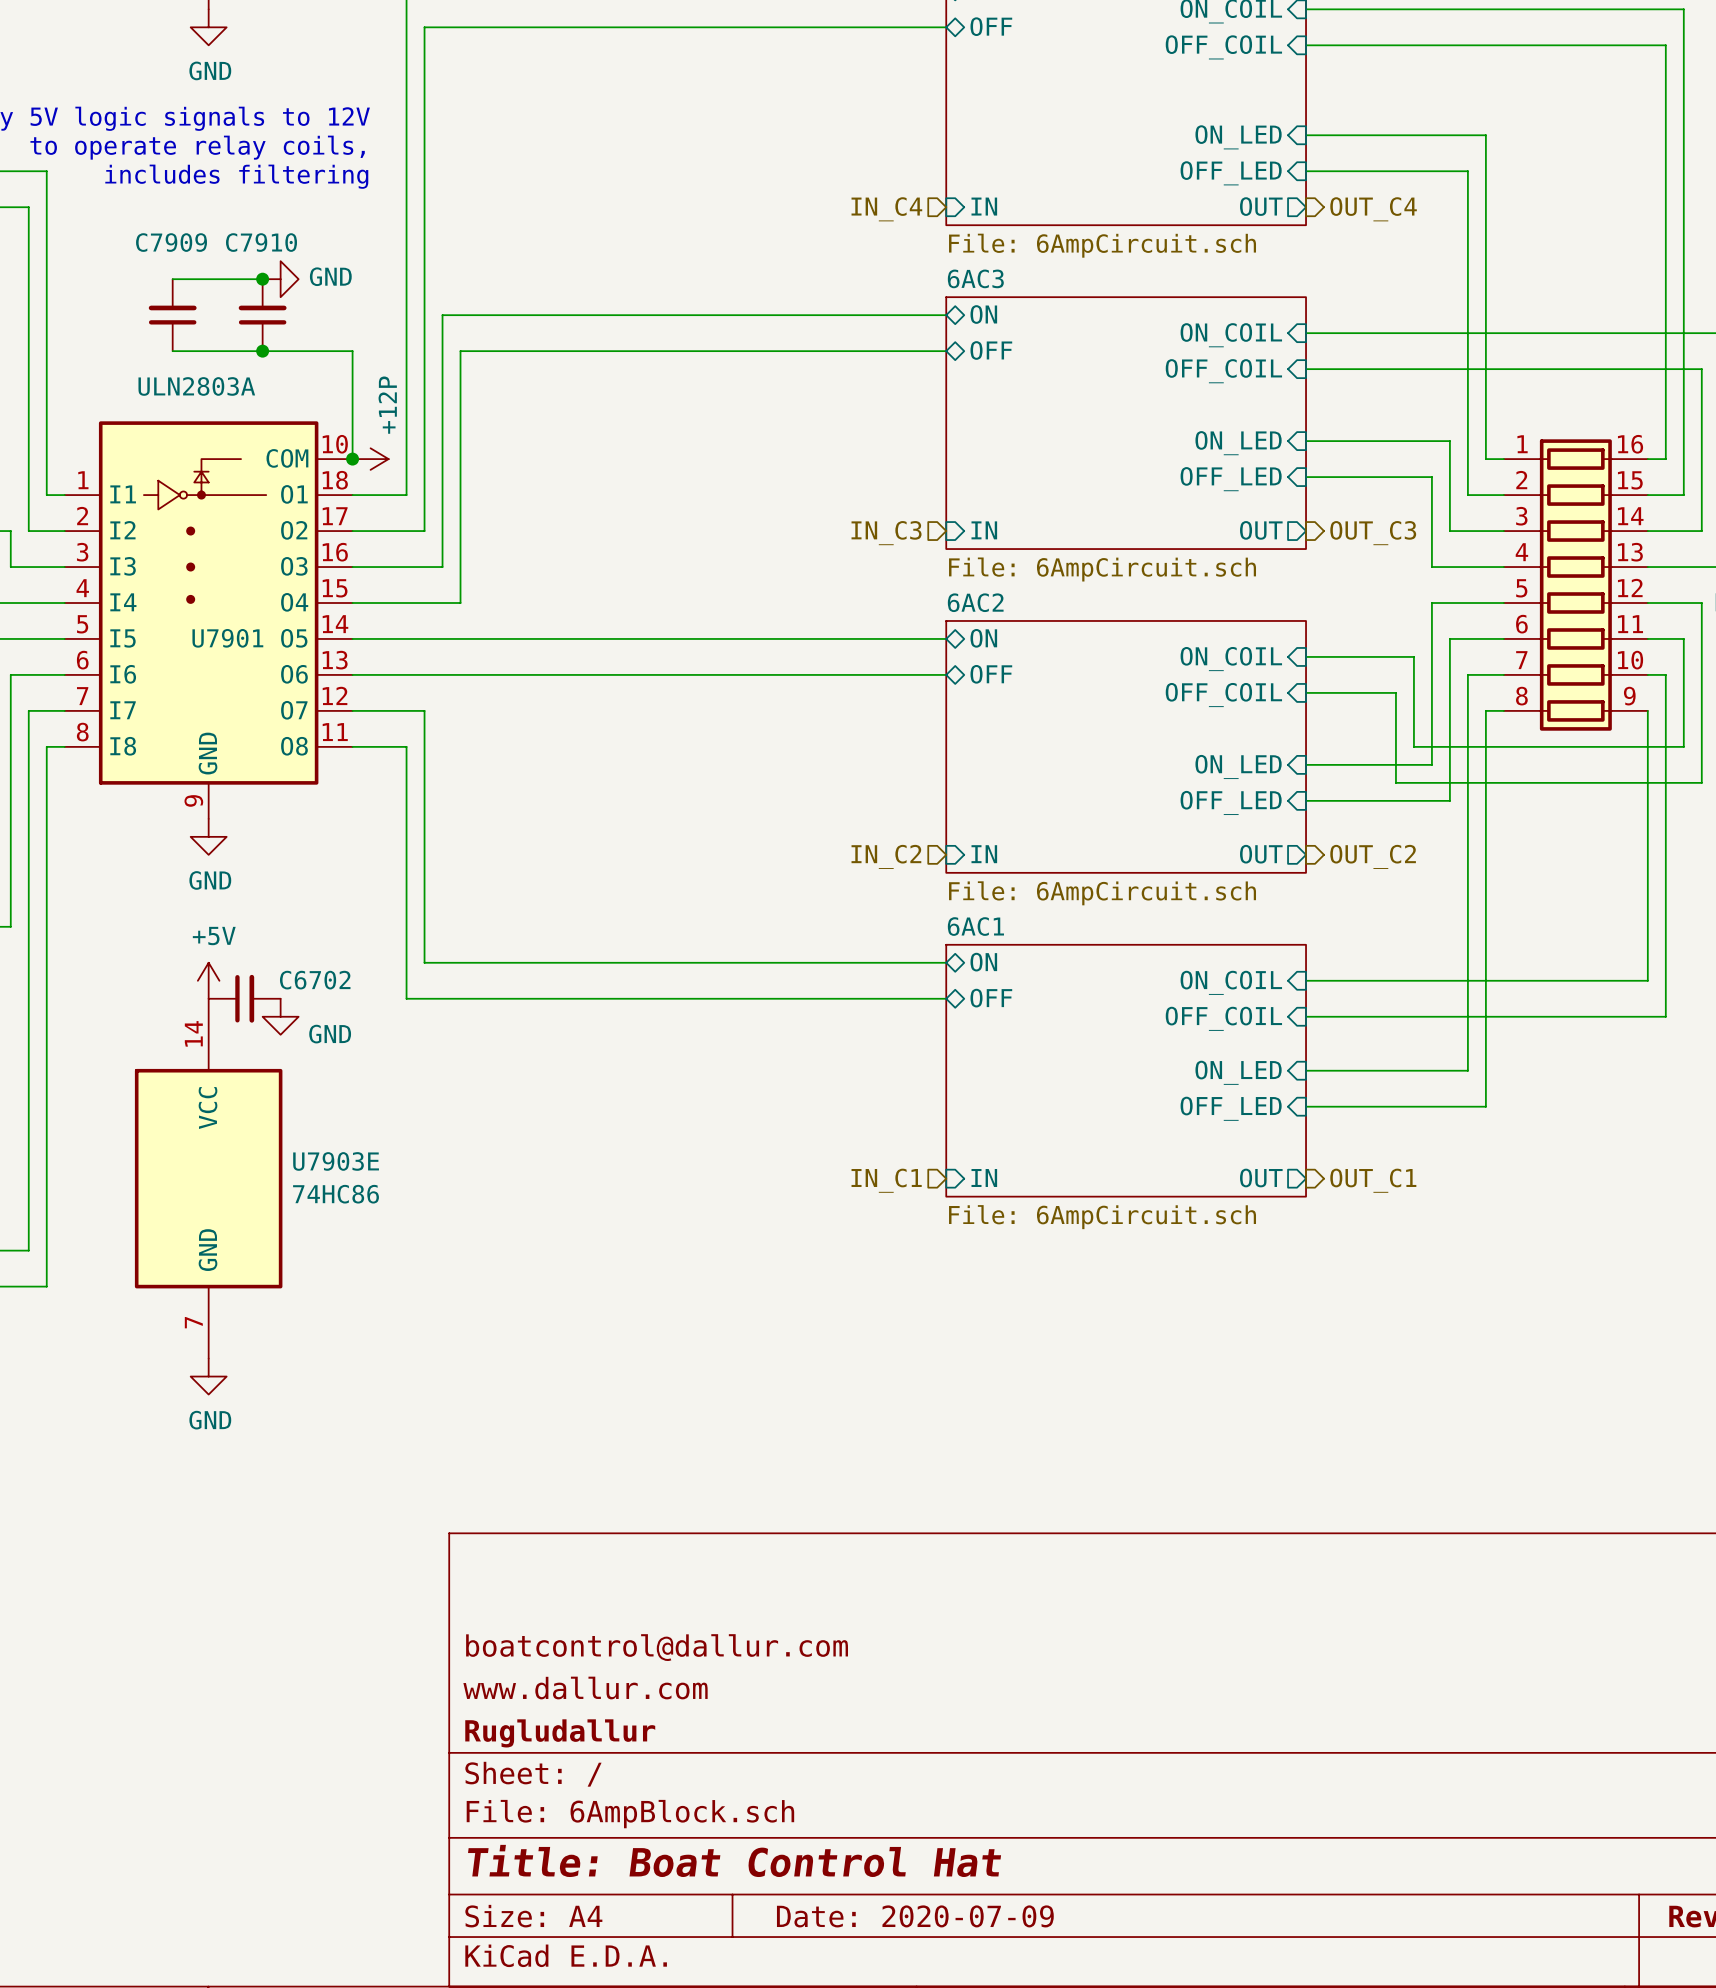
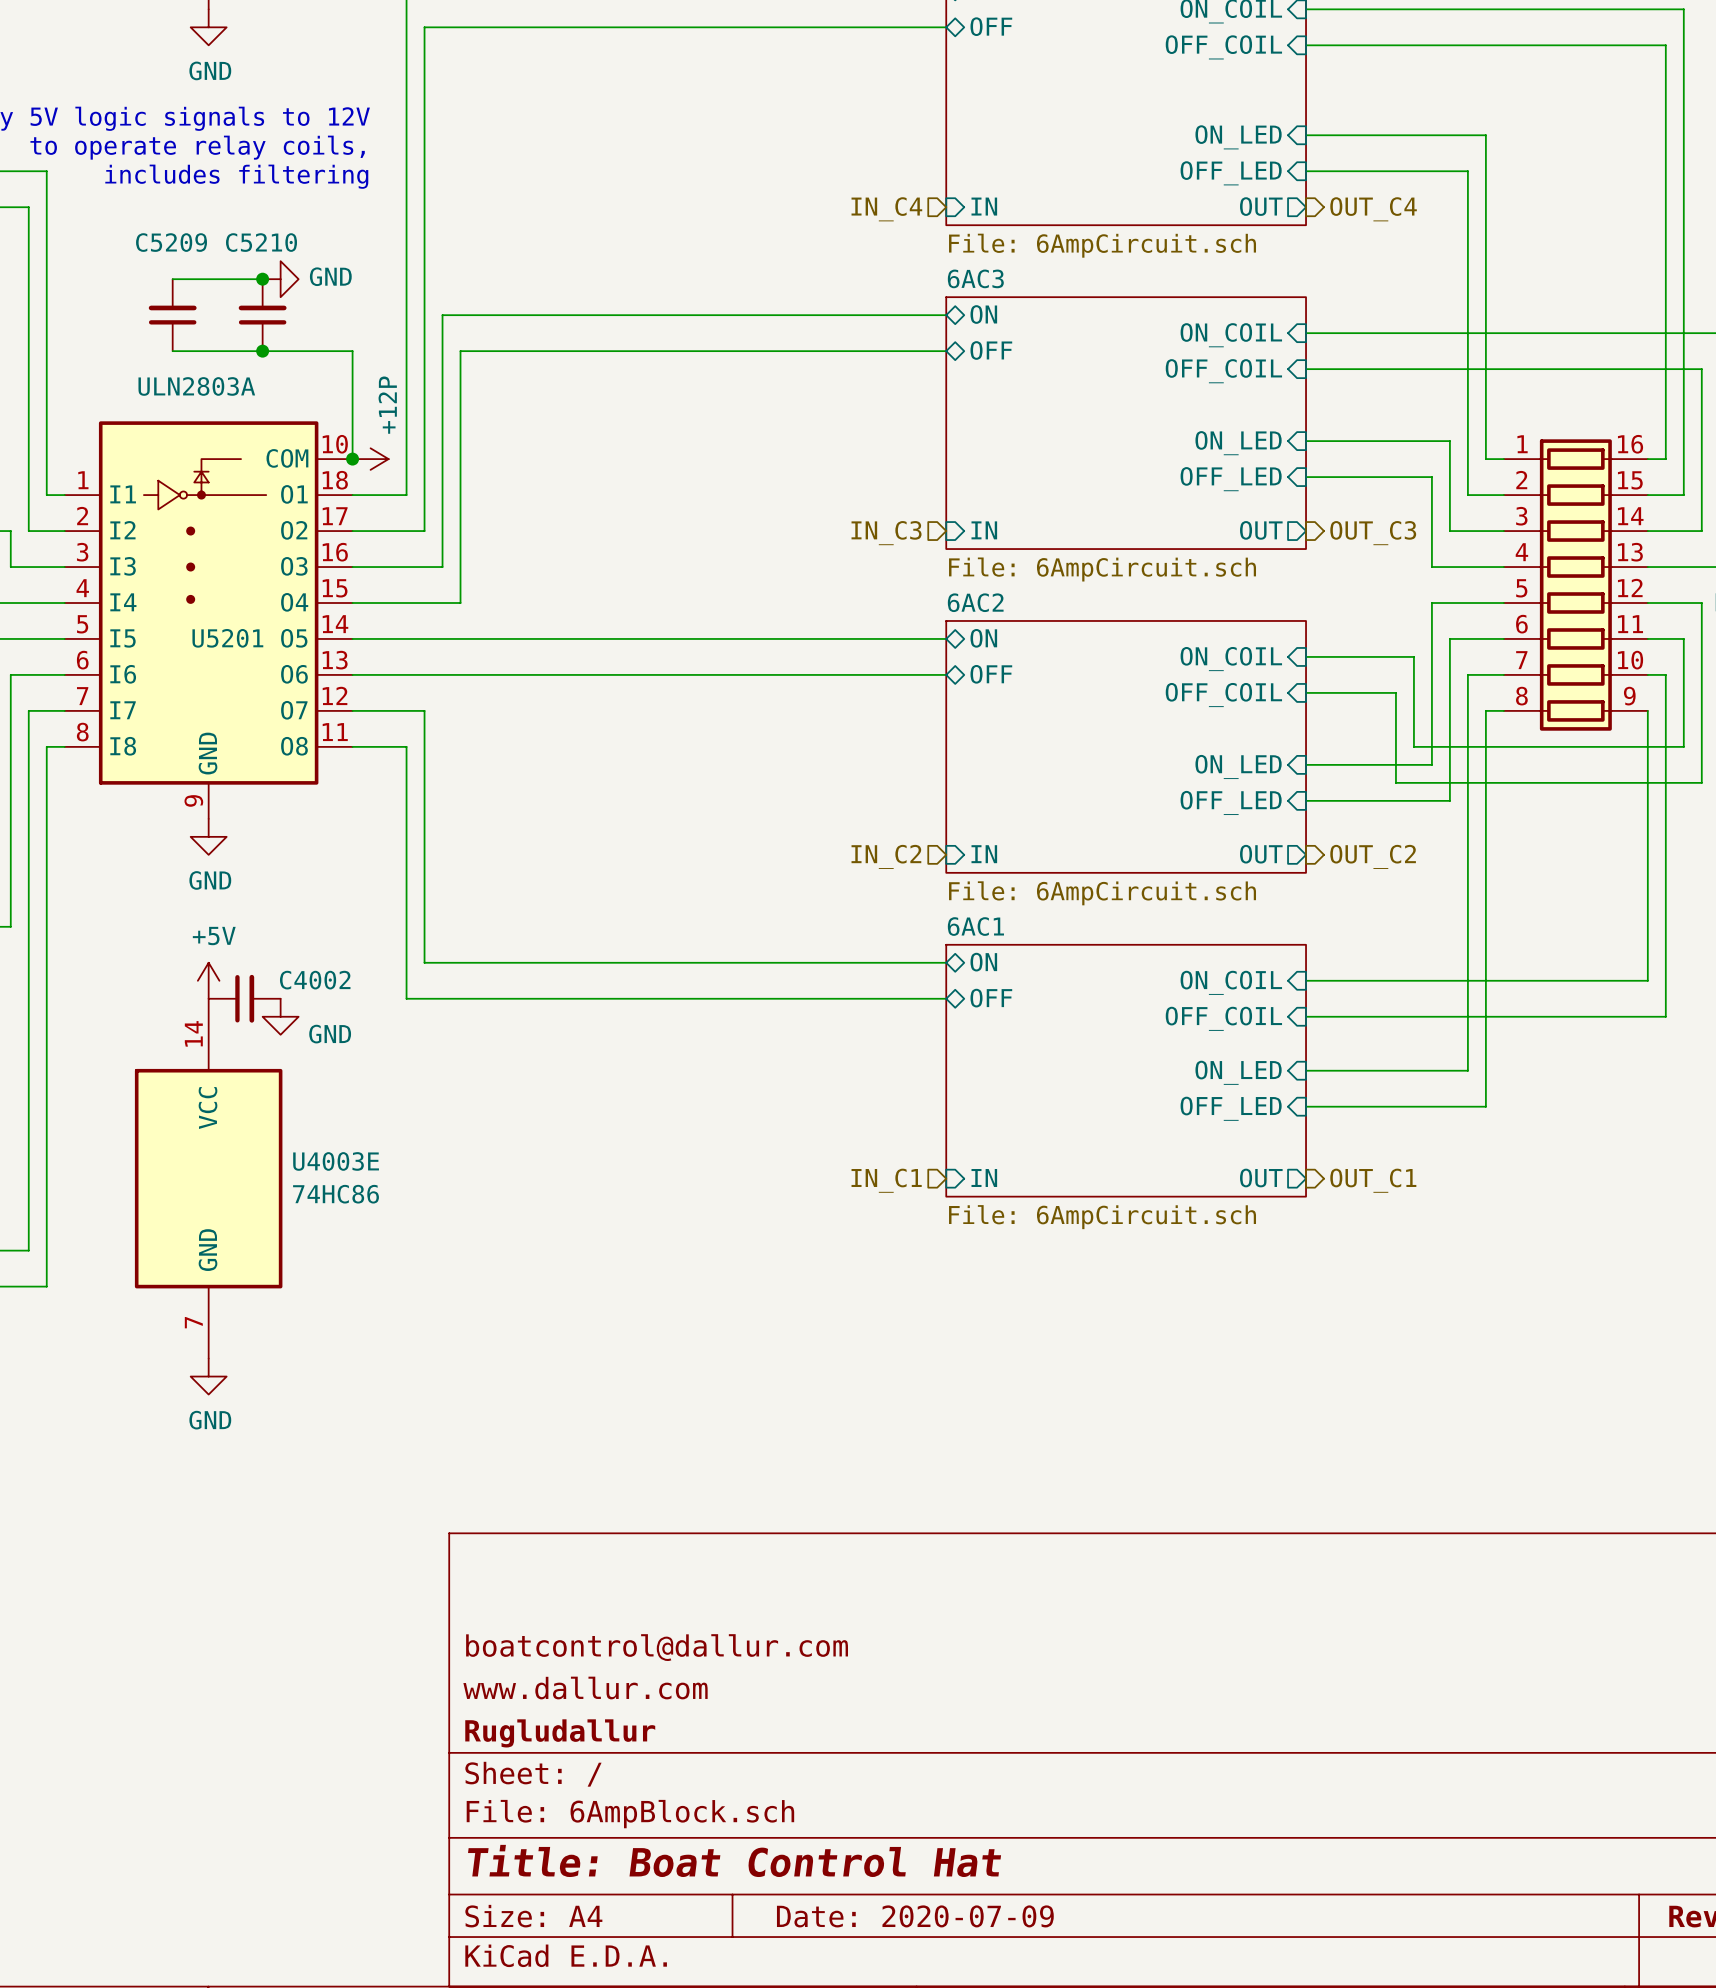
C7909 name: C7909 (171, 242) -> C5209 (171, 242)
C7910 name: C7910 (261, 242) -> C5210 (261, 242)
U7901 name: U7901 (227, 638) -> U5201 (227, 638)
C6702 name: C6702 (315, 980) -> C4002 (315, 980)
U7903E name: U7903E (336, 1161) -> U4003E (336, 1161)

